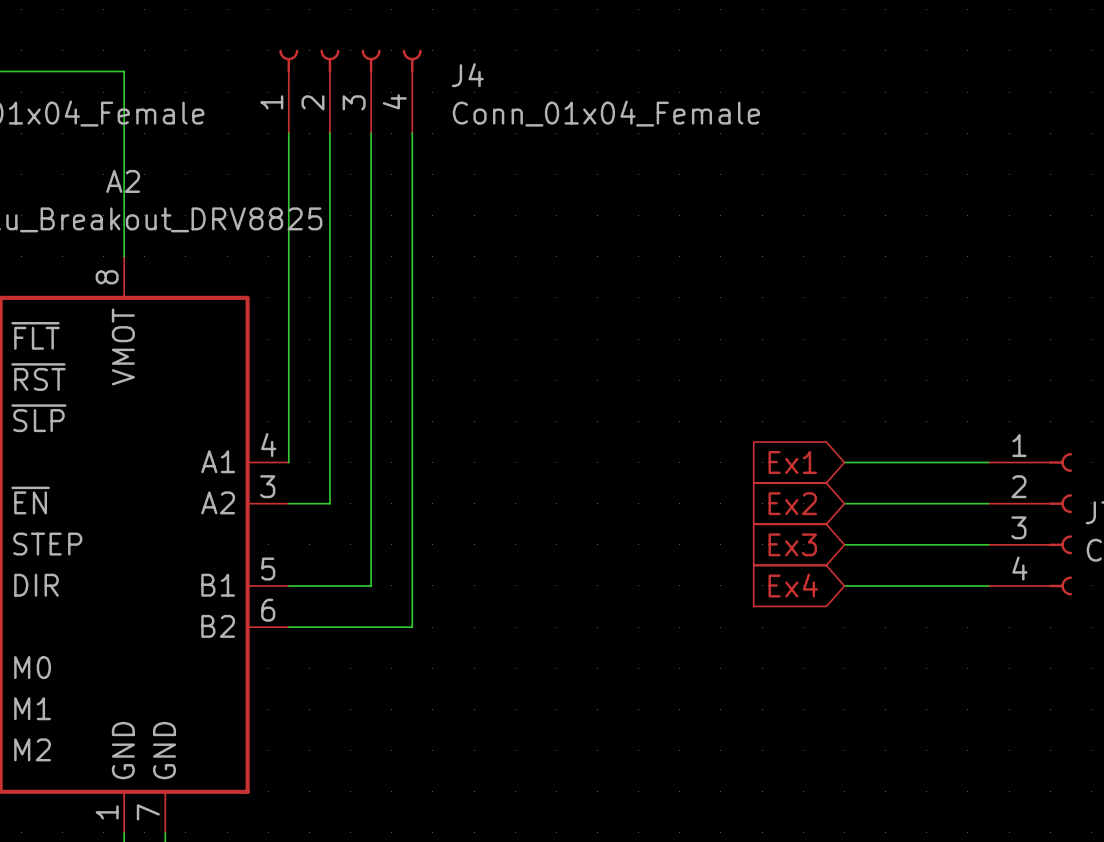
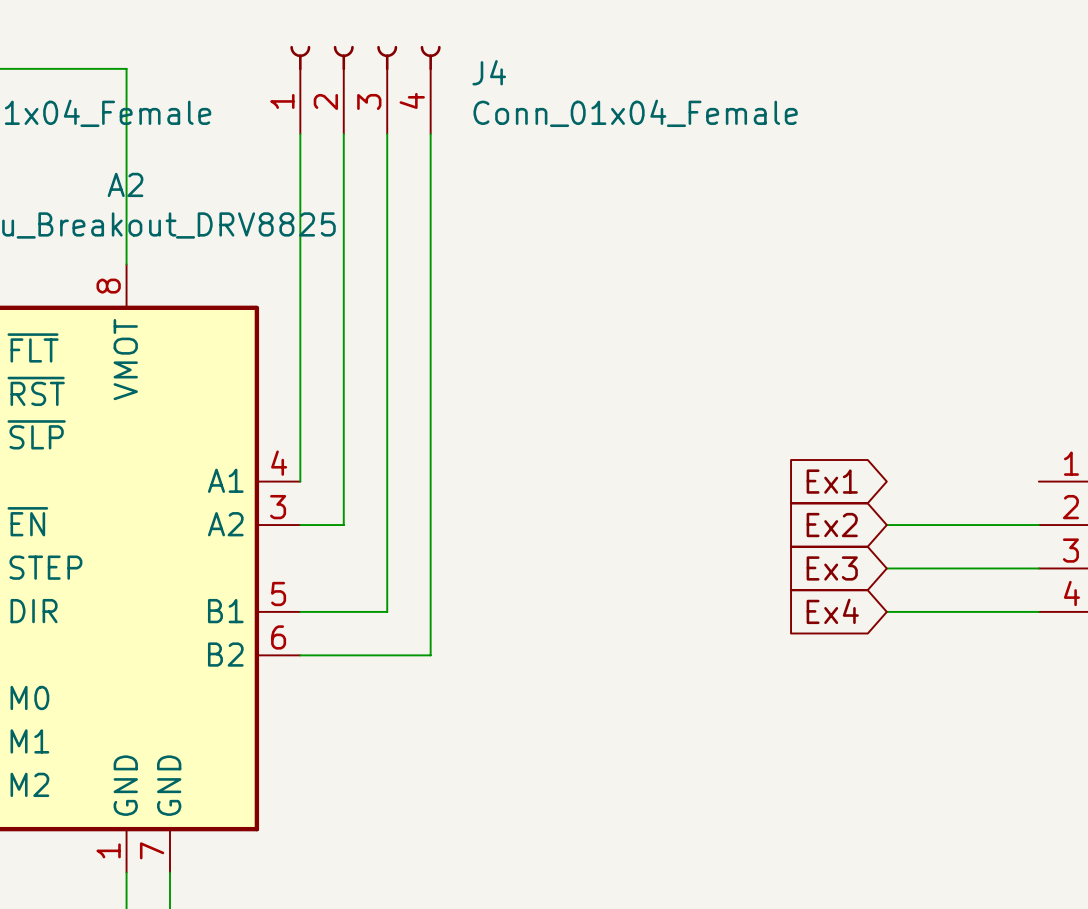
wire: (844, 462) (988, 462) -> none

